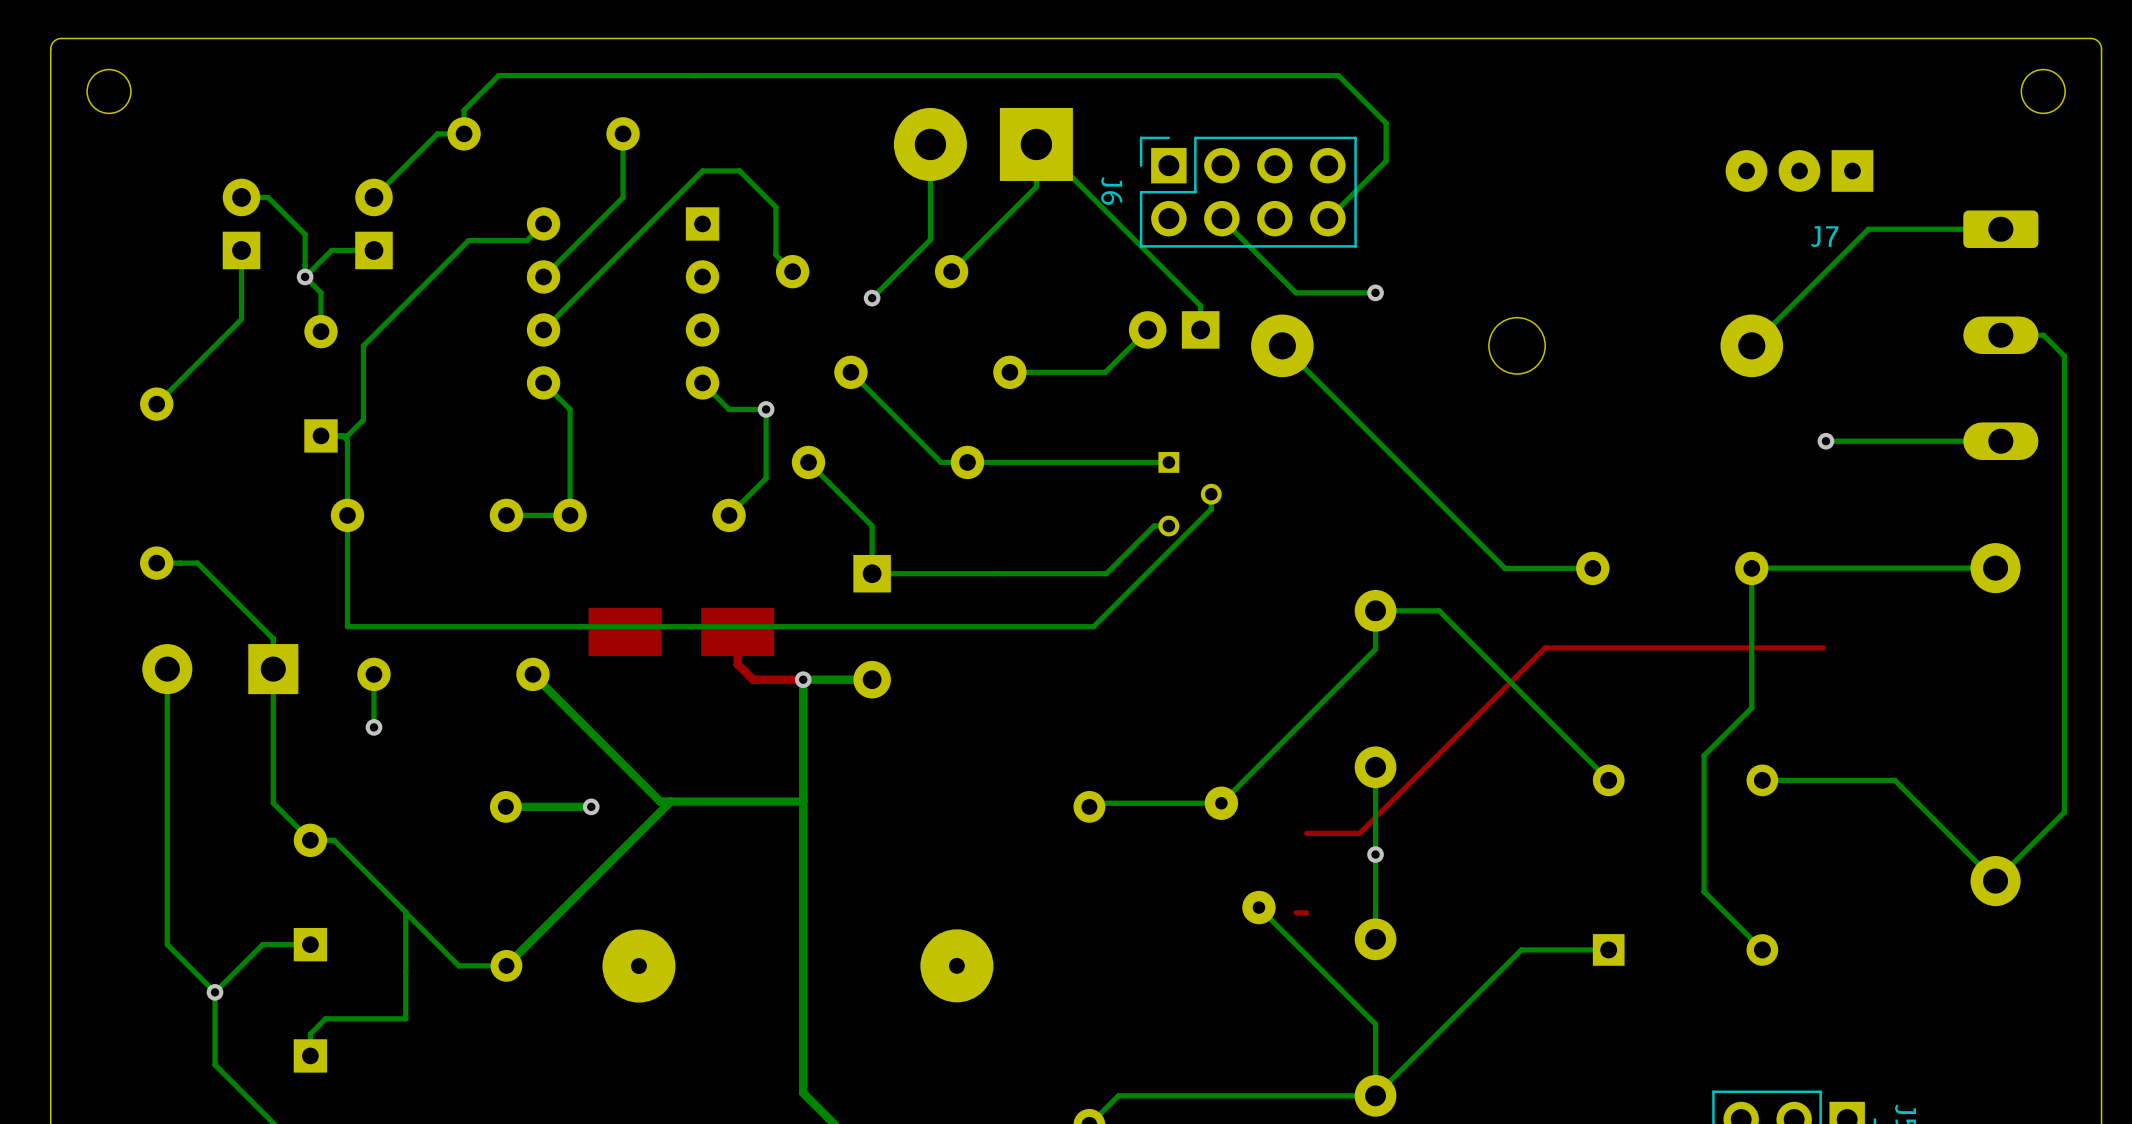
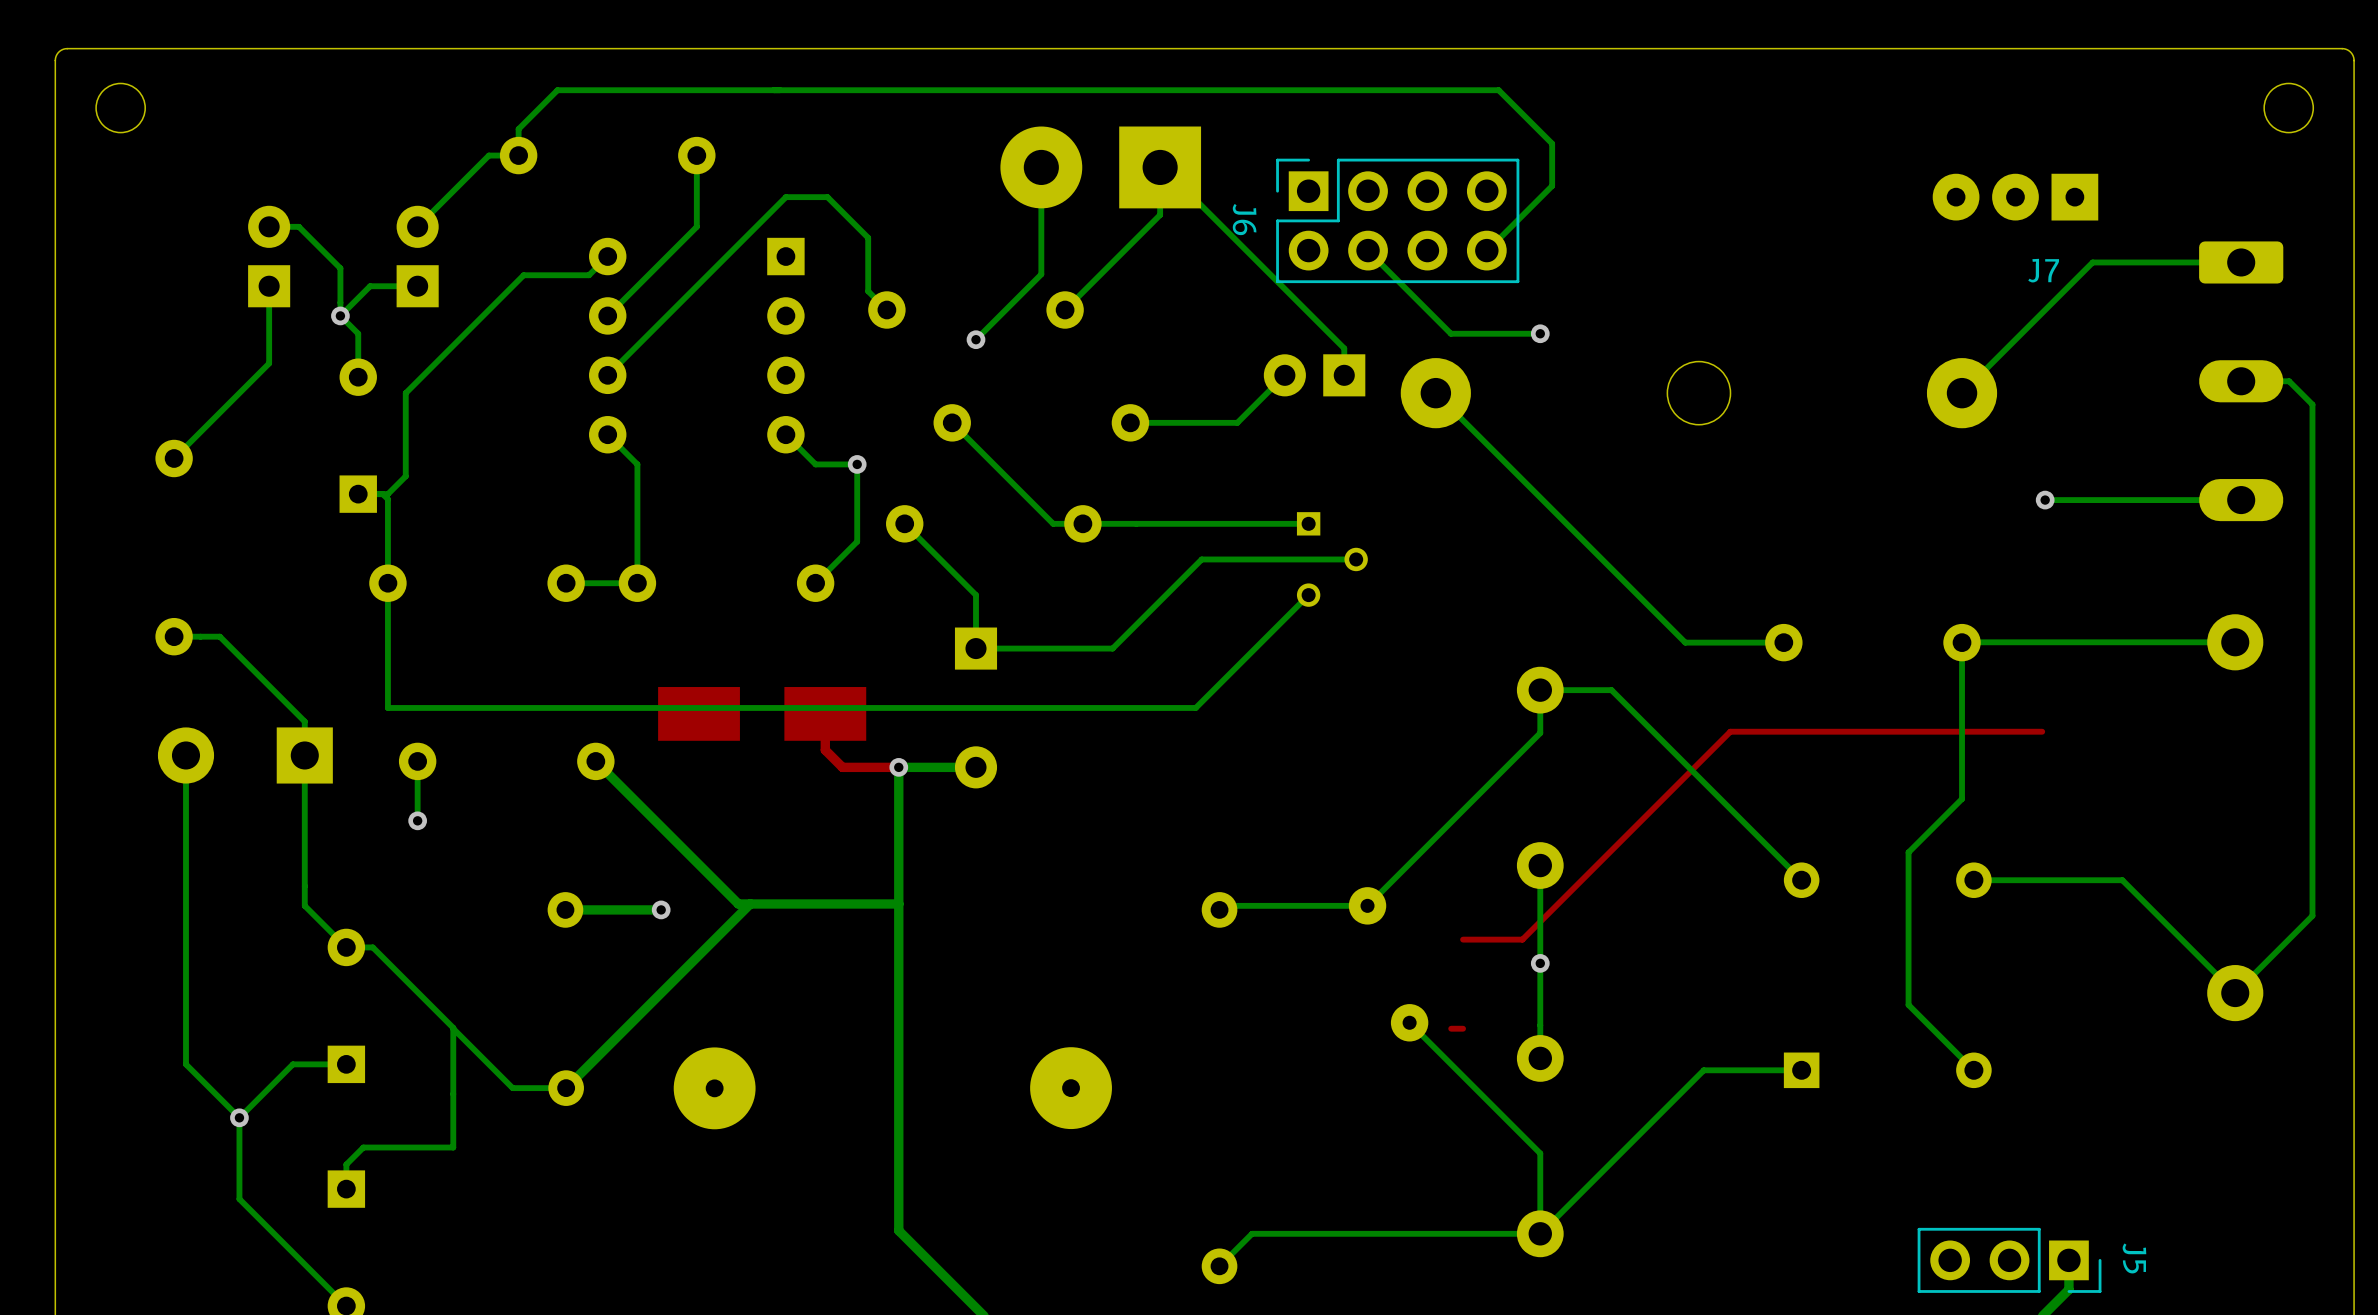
bottom track: (1211, 494) (1211, 509) (1093, 626) (1068, 626) -> (1308, 595) (1195, 707)
bottom track: (1168, 526) (1154, 526) (1106, 573) (993, 573) -> (1356, 559) (1201, 559) (1112, 648)

